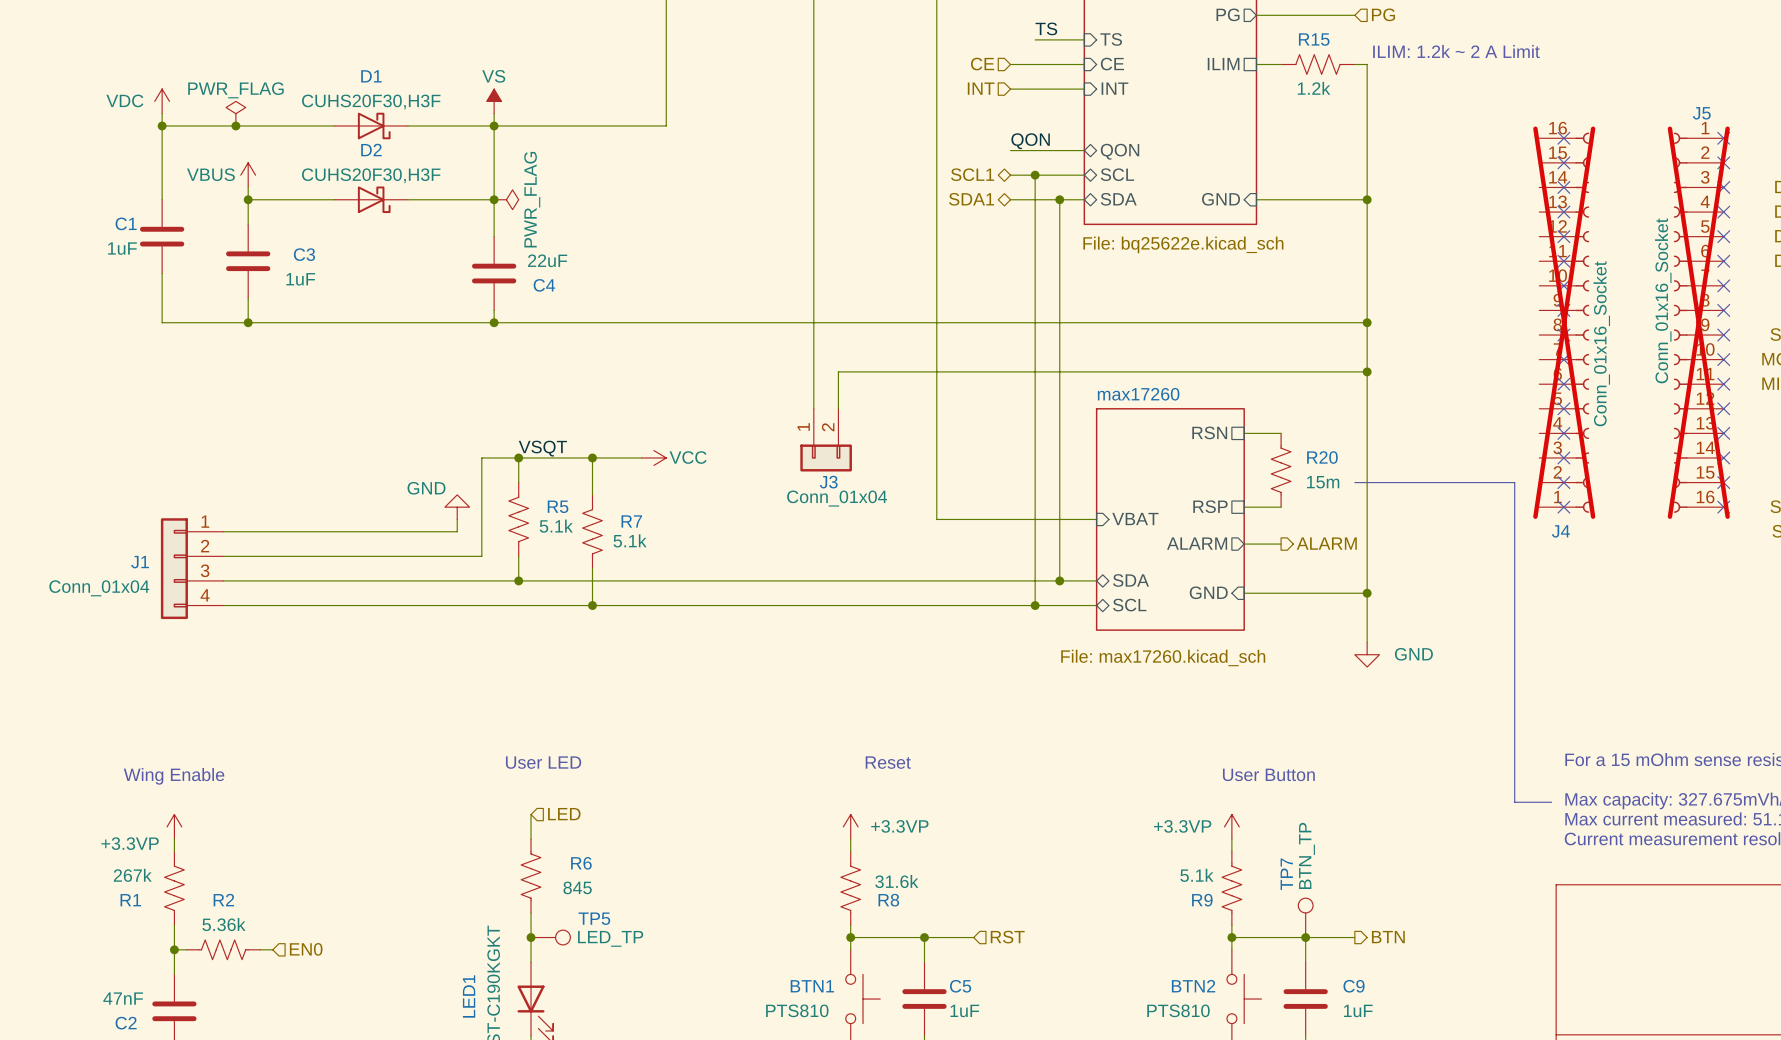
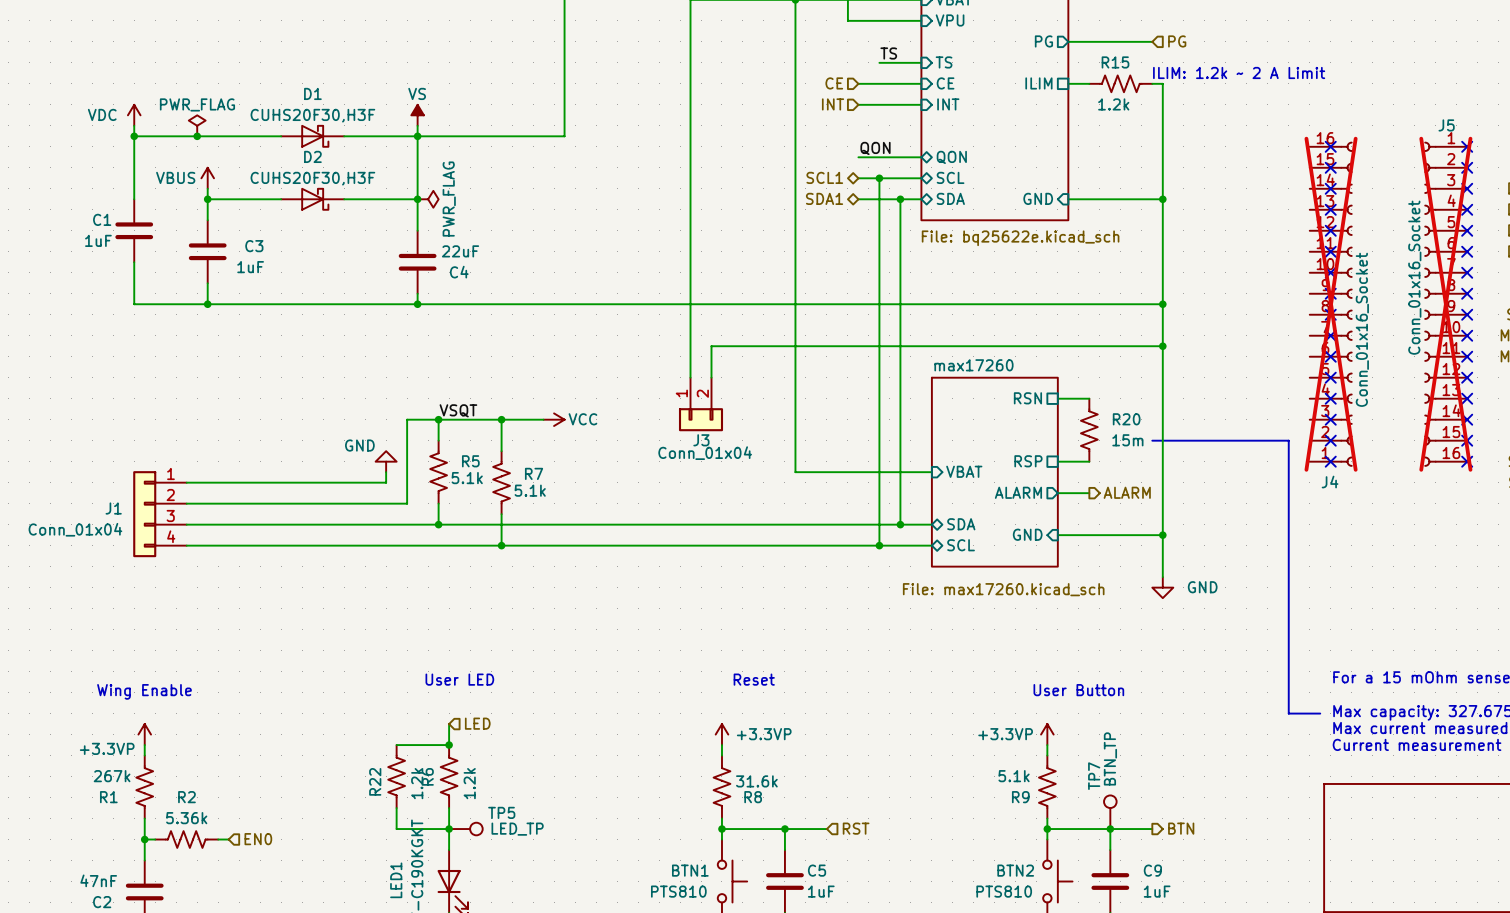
wire: none -> (396, 745) (449, 745)
junction: none -> (449, 745)
R6 name rotation: 0° (581, 863) -> 90° counterclockwise (427, 776)
R6 name position: R6 (581, 863) -> R6 (427, 776)
R22: none -> 1.2k (396, 776)
R6 value: 845 (577, 887) -> 1.2k (469, 783)
wire: none -> (396, 808) (396, 829) (449, 829)

